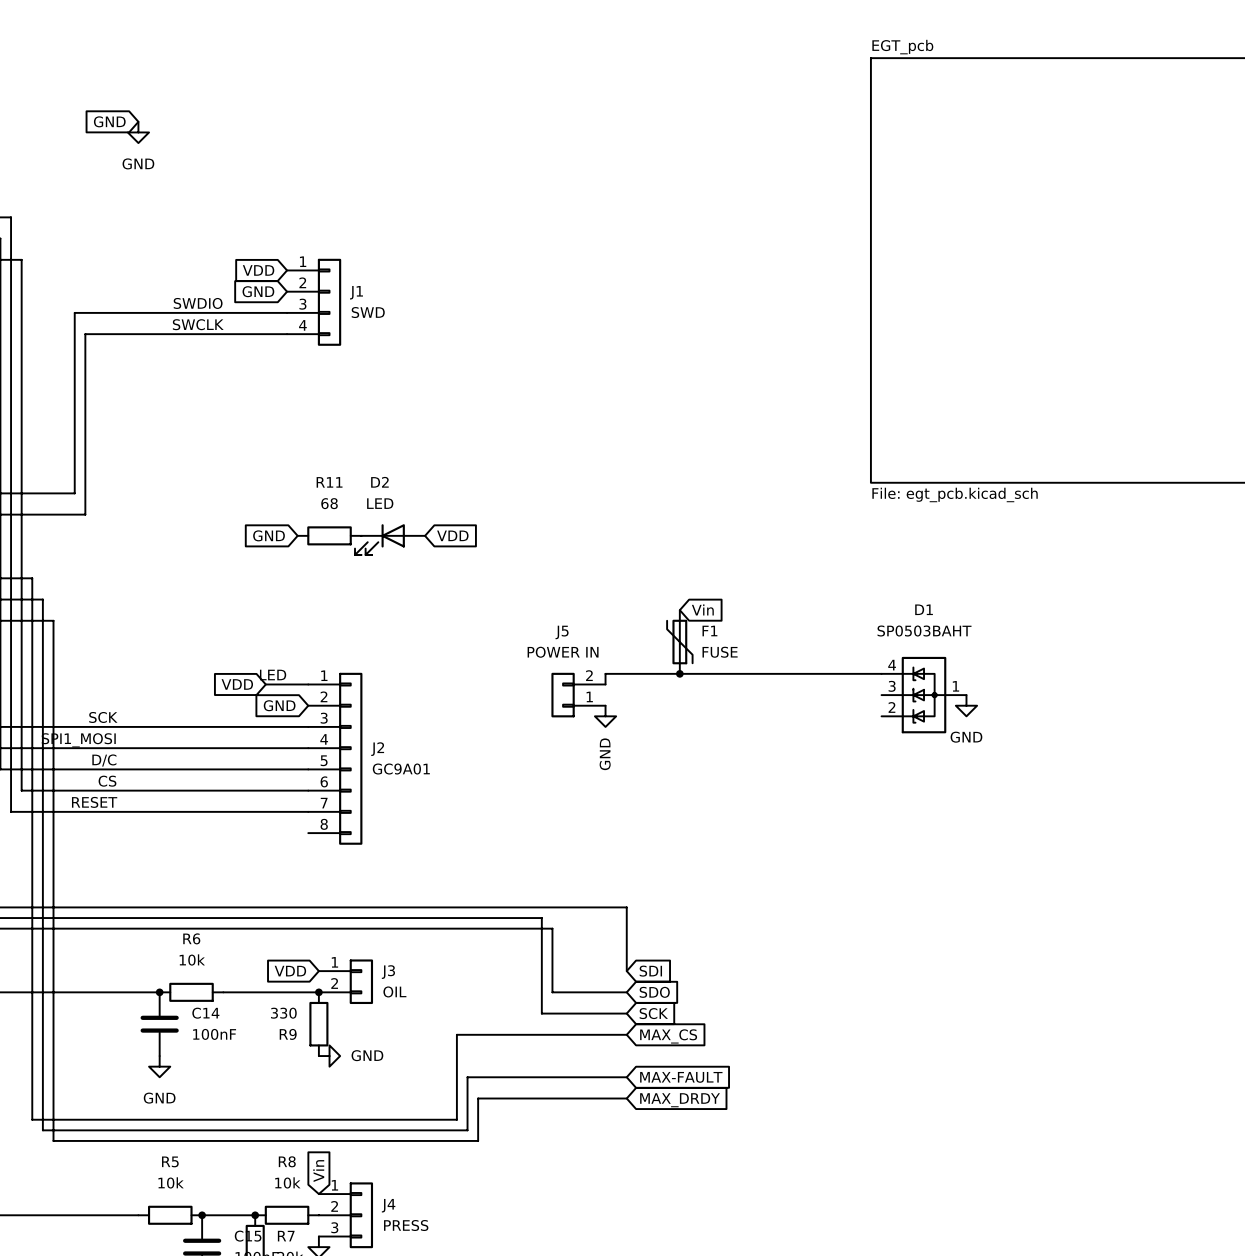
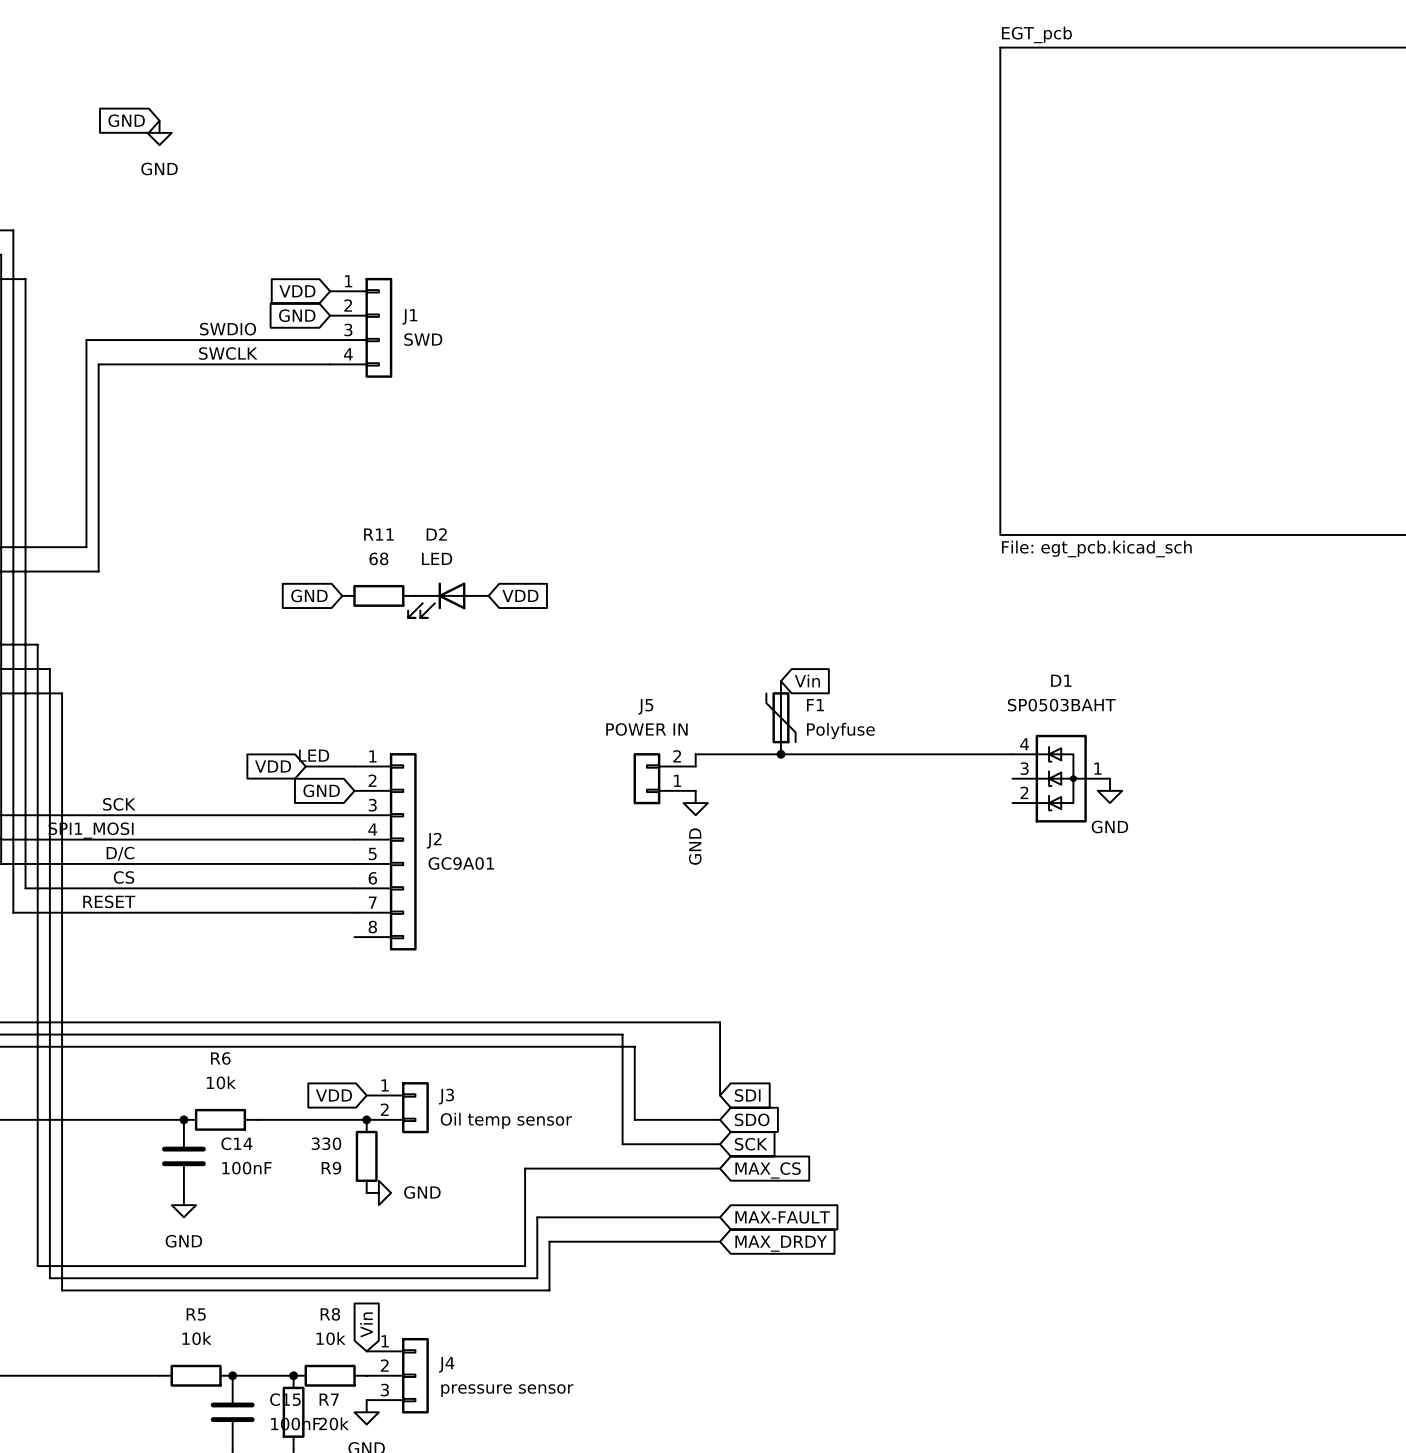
F1 value: FUSE (720, 652) -> Polyfuse (840, 730)
J3 value: OIL (394, 991) -> Oil temp sensor (506, 1120)
J4 value: PRESS (406, 1225) -> pressure sensor (507, 1390)

